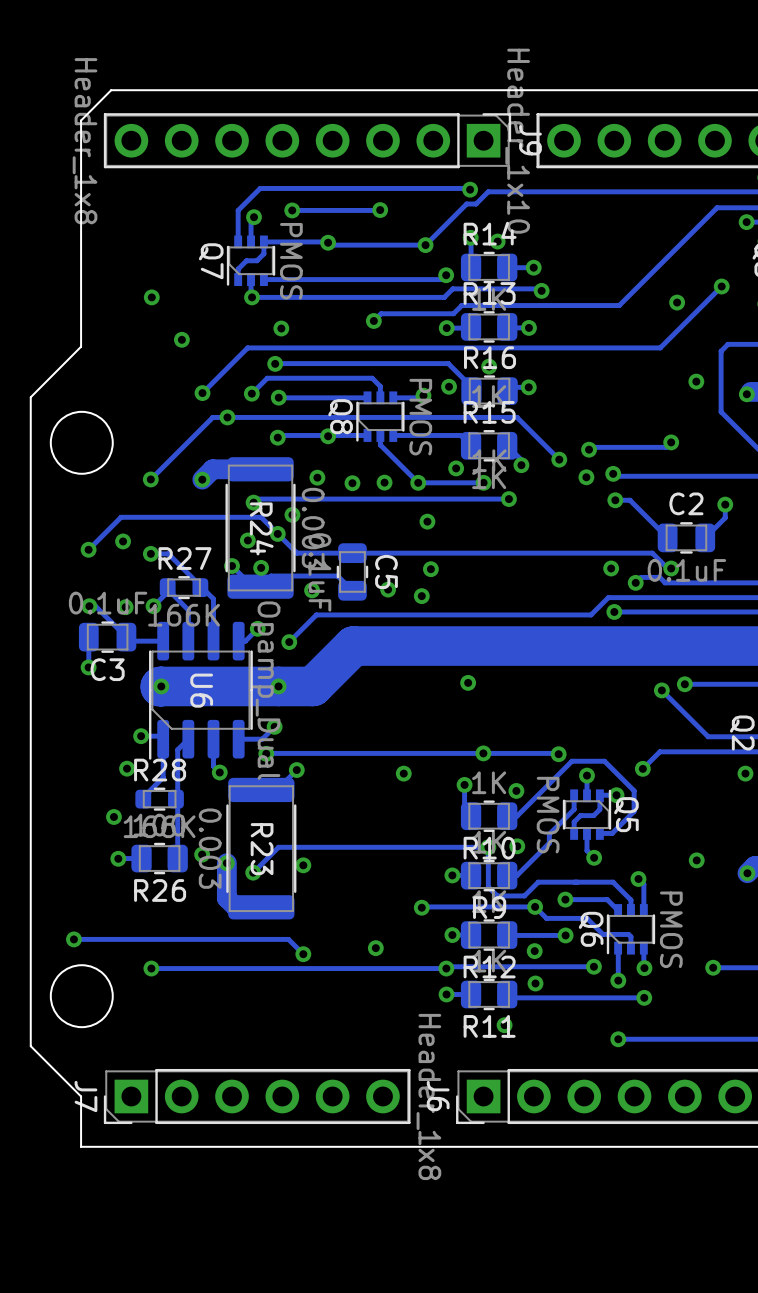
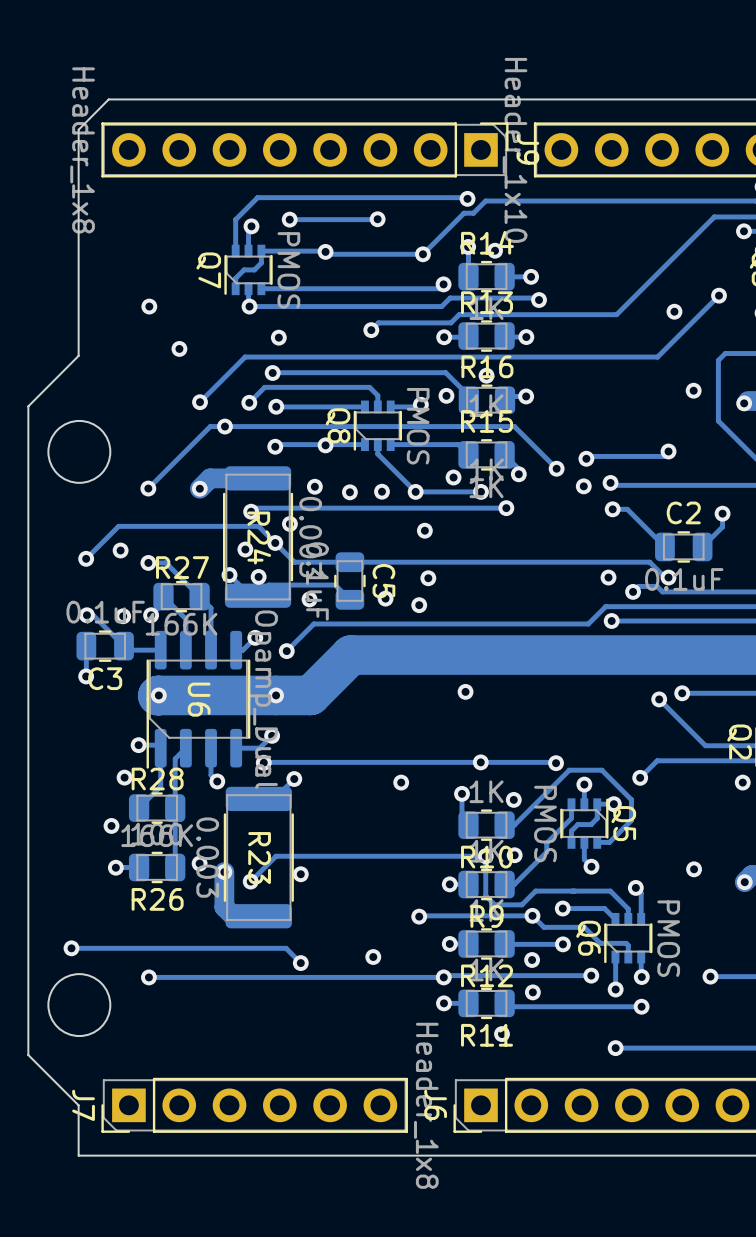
R27 footprint: [159, 576, 209, 600] -> [153, 580, 210, 613]
R28 footprint: [135, 787, 184, 811] -> [128, 792, 186, 824]

